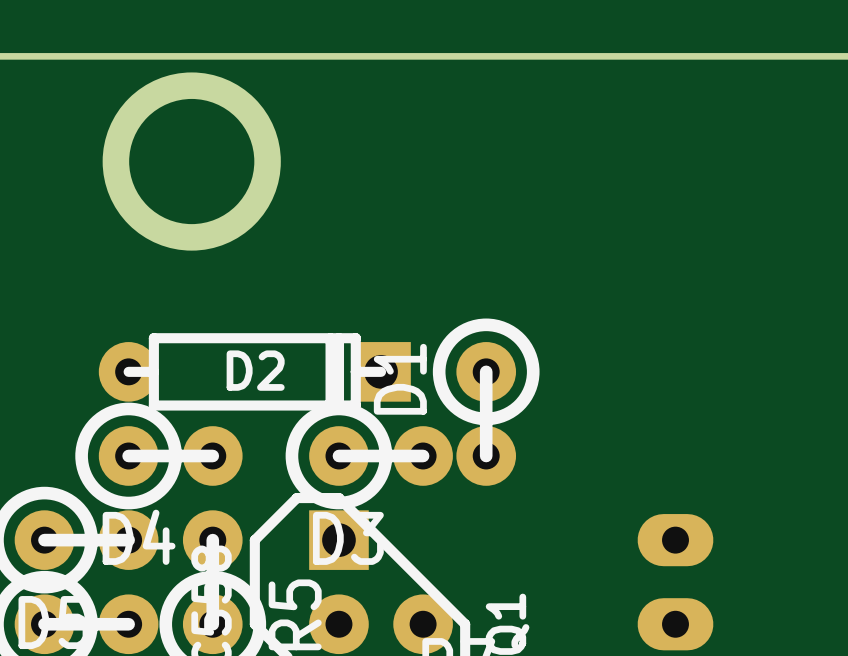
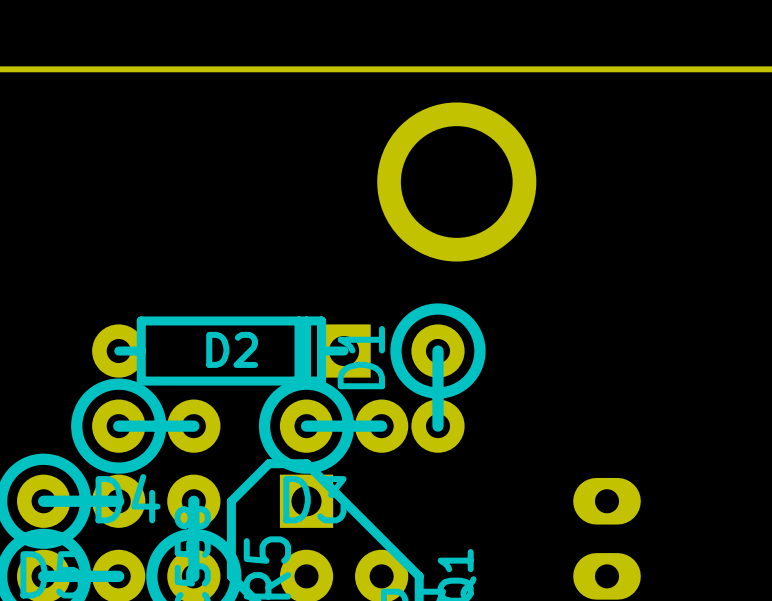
round board edge position: (191, 161) -> (456, 182)

